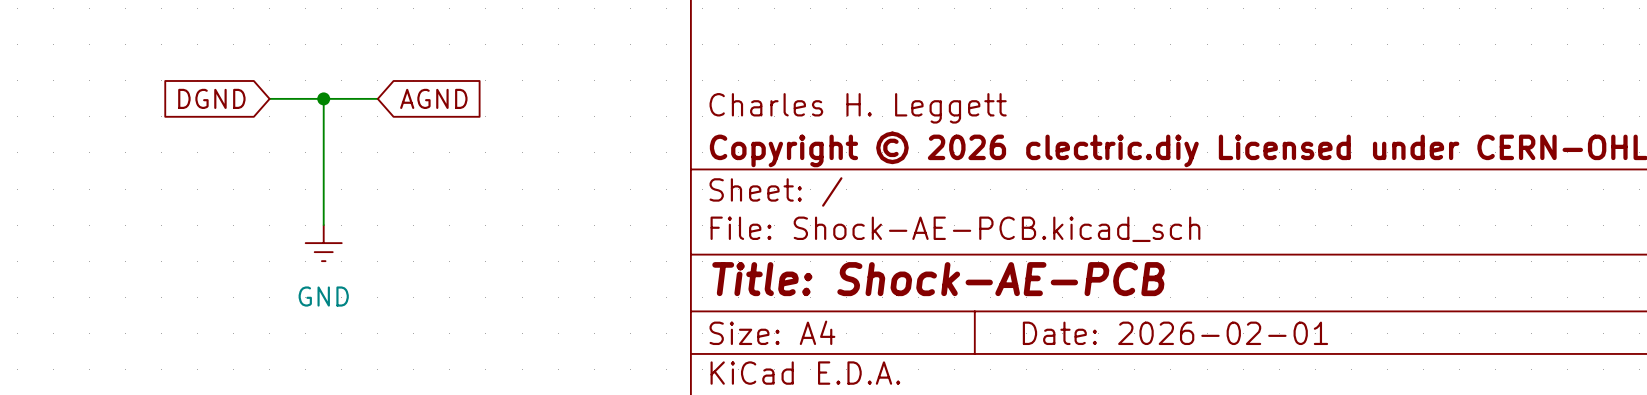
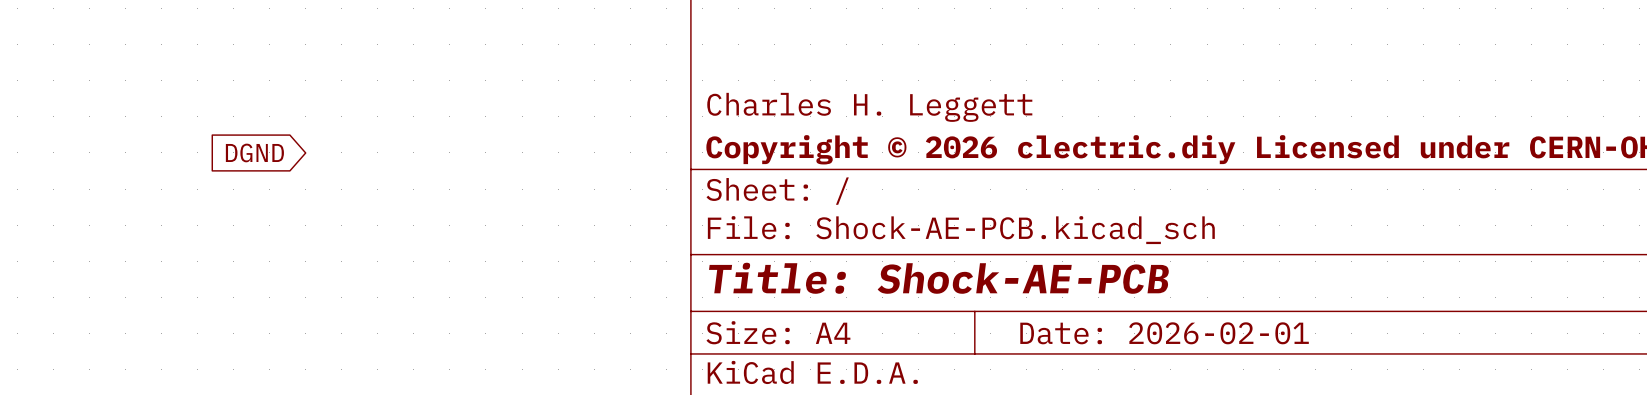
global label position: DGND (211, 98) -> DGND (254, 152)
wire: (269, 98) (377, 98) -> none
wire: (323, 98) (323, 225) -> none
junction: (323, 98) -> none
global label: AGND (433, 98) -> none
power symbol: GND (323, 243) -> none

